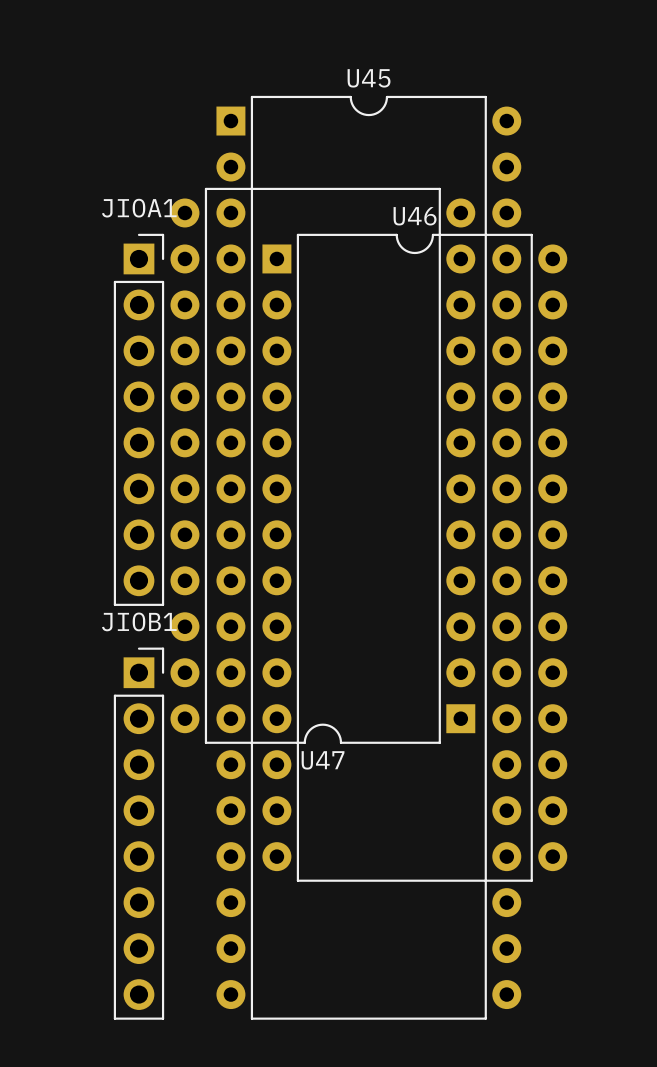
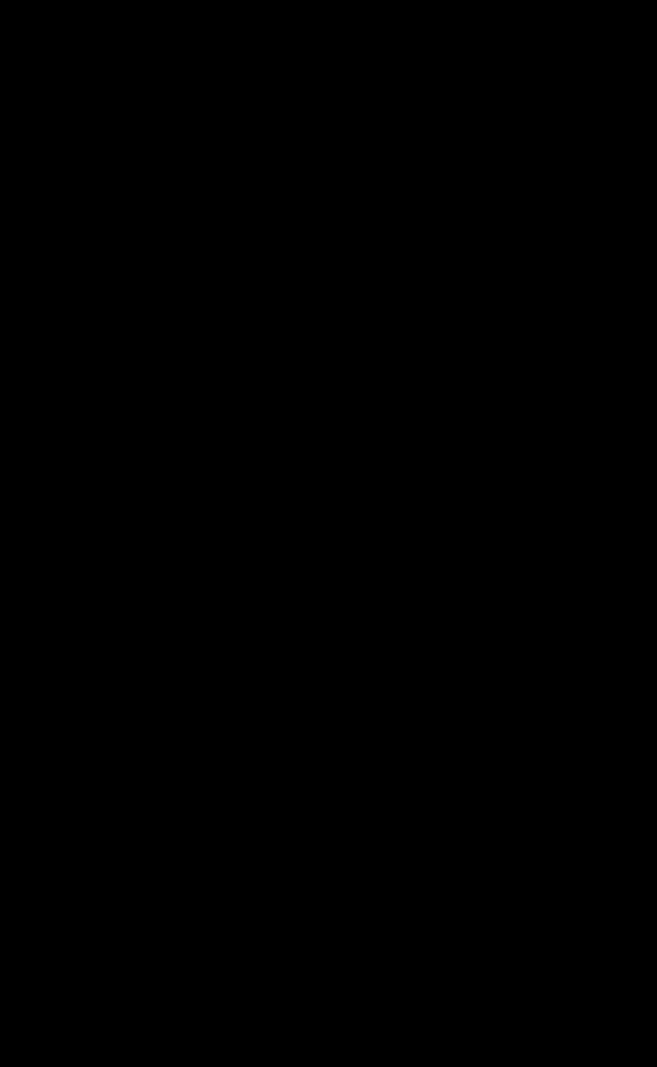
JIOA1: (138, 419) -> none
U47: (322, 465) -> none
U45: (368, 557) -> none
U46: (414, 557) -> none
JIOB1: (138, 833) -> none

